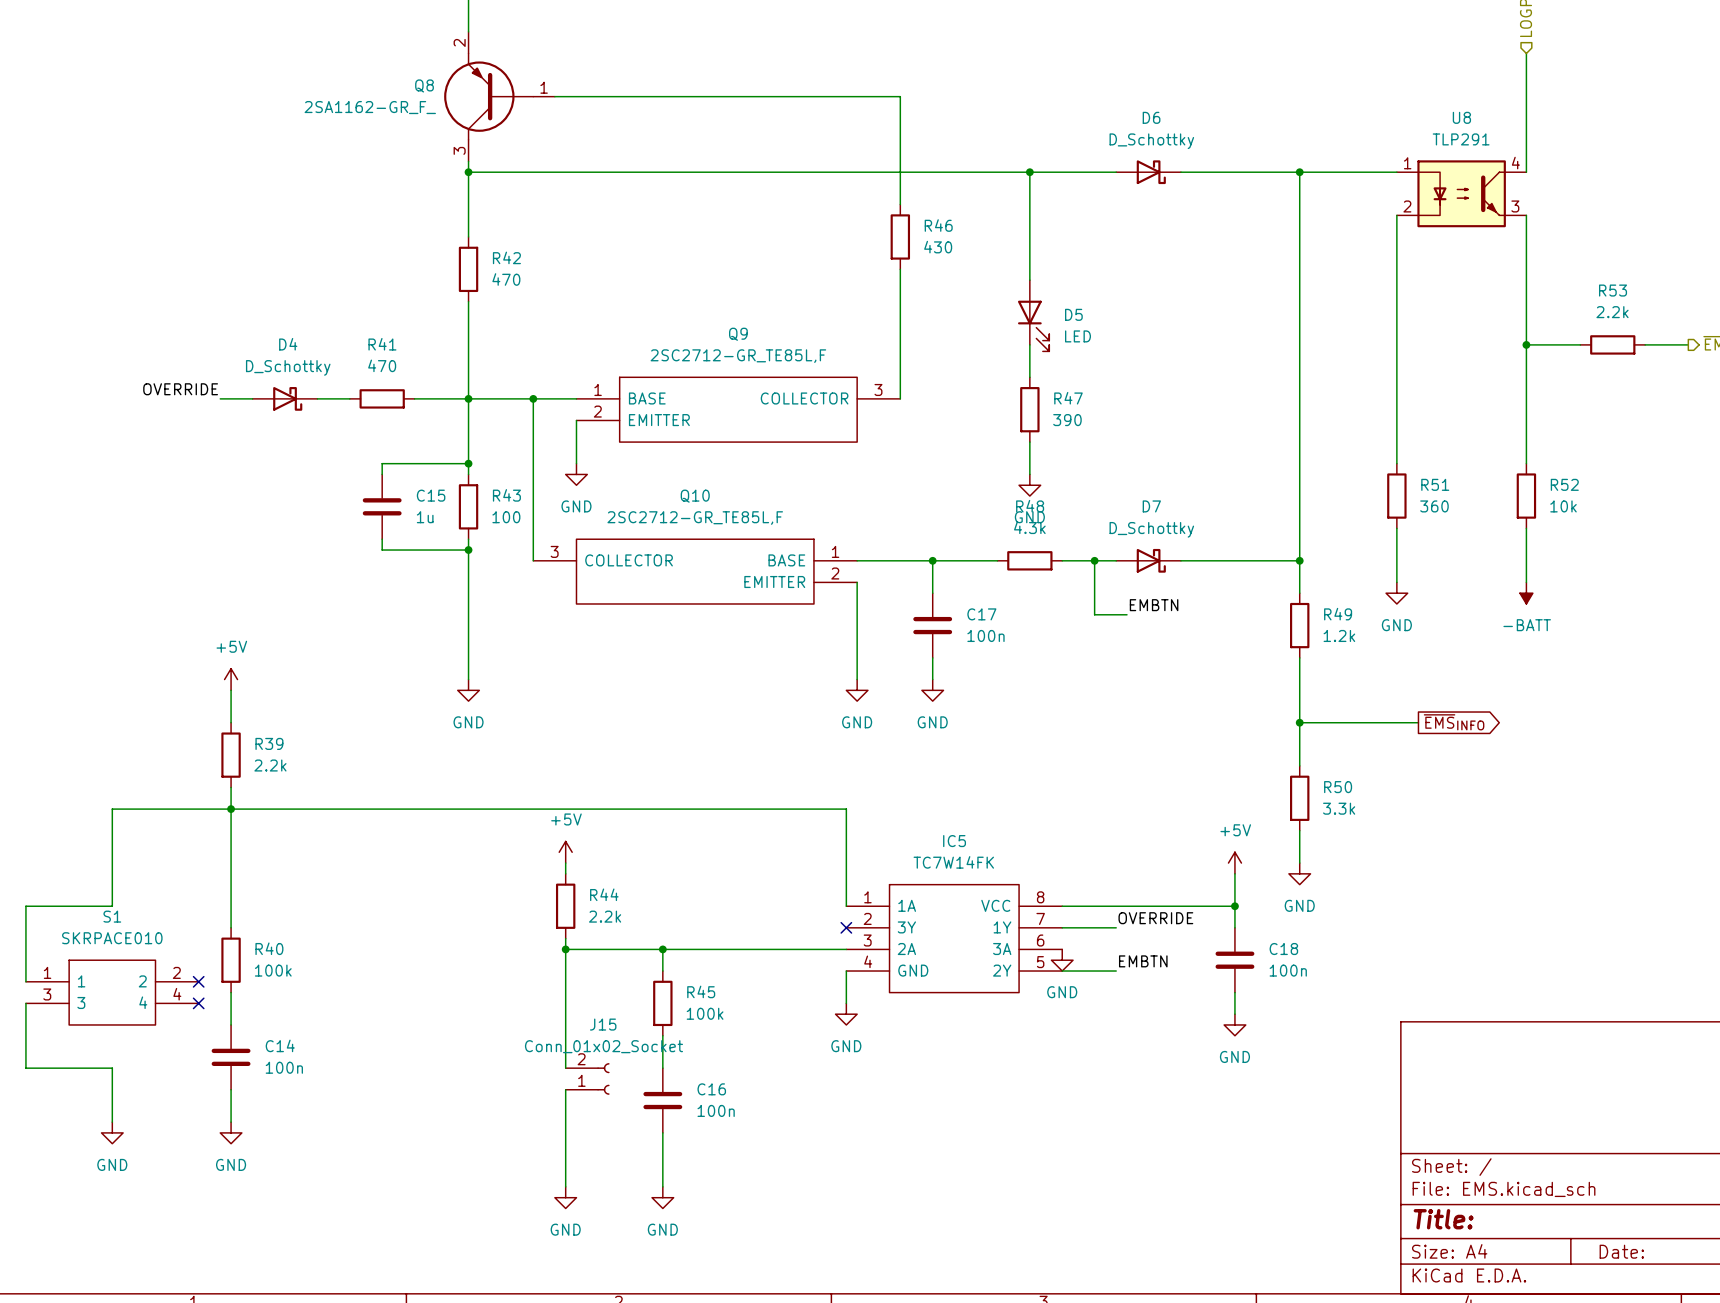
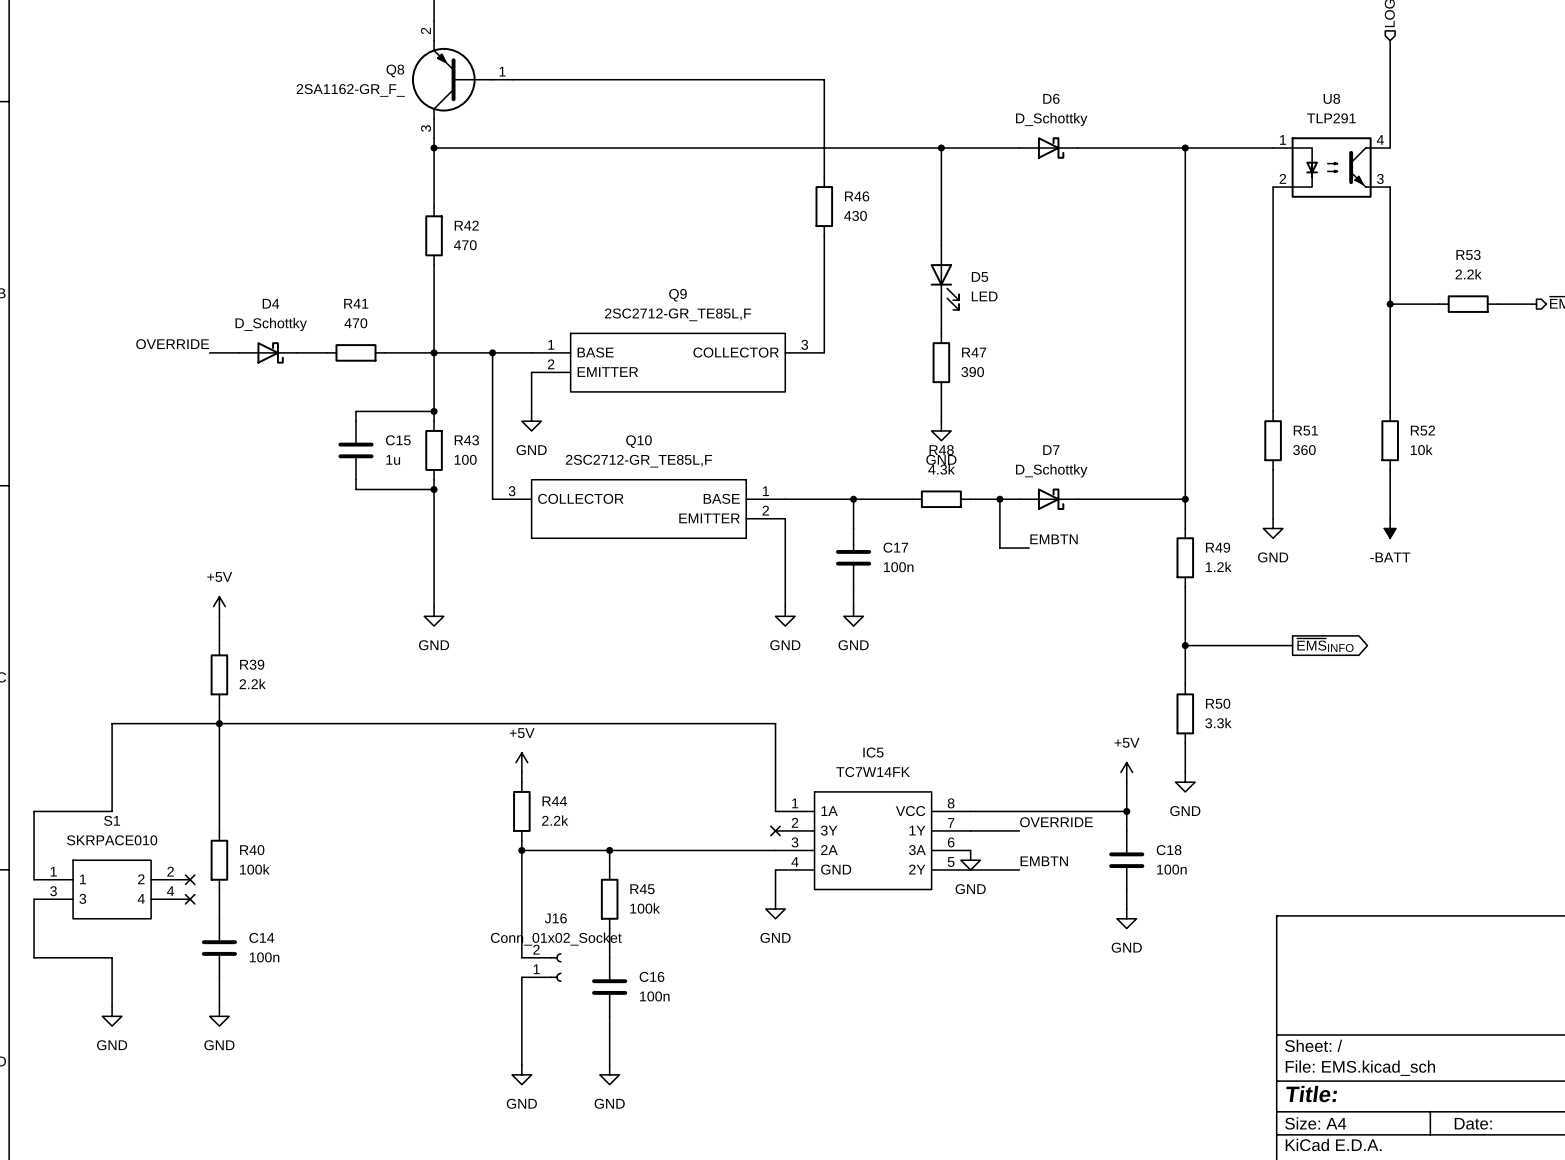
J15 name: J15 (603, 1024) -> J16 (555, 918)

